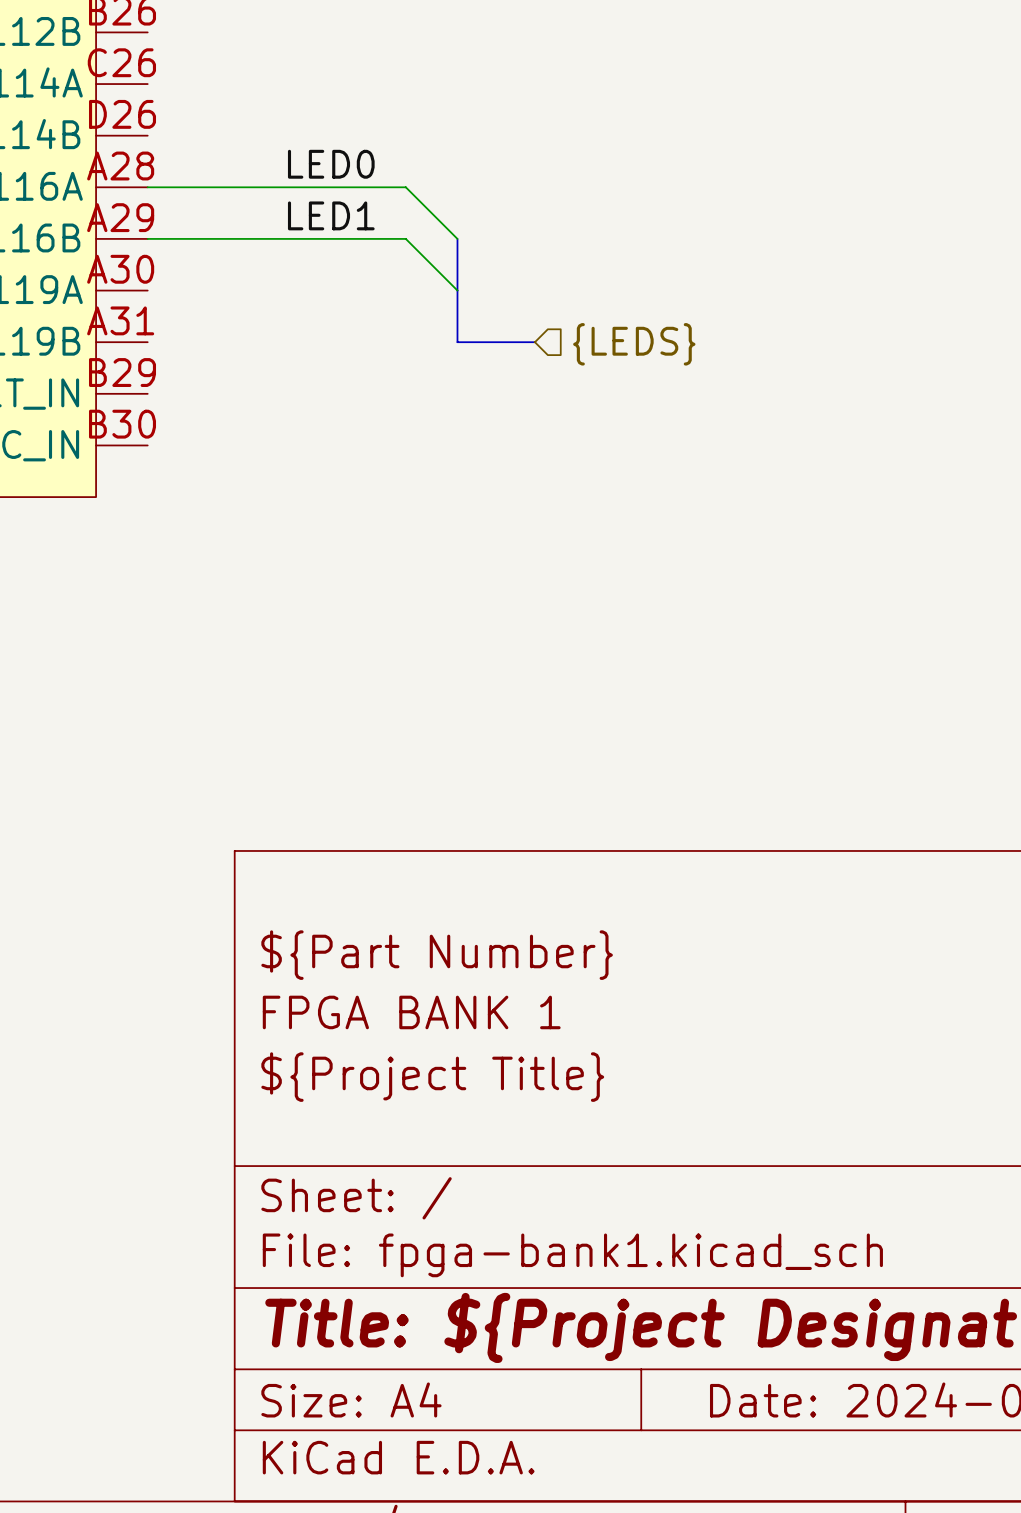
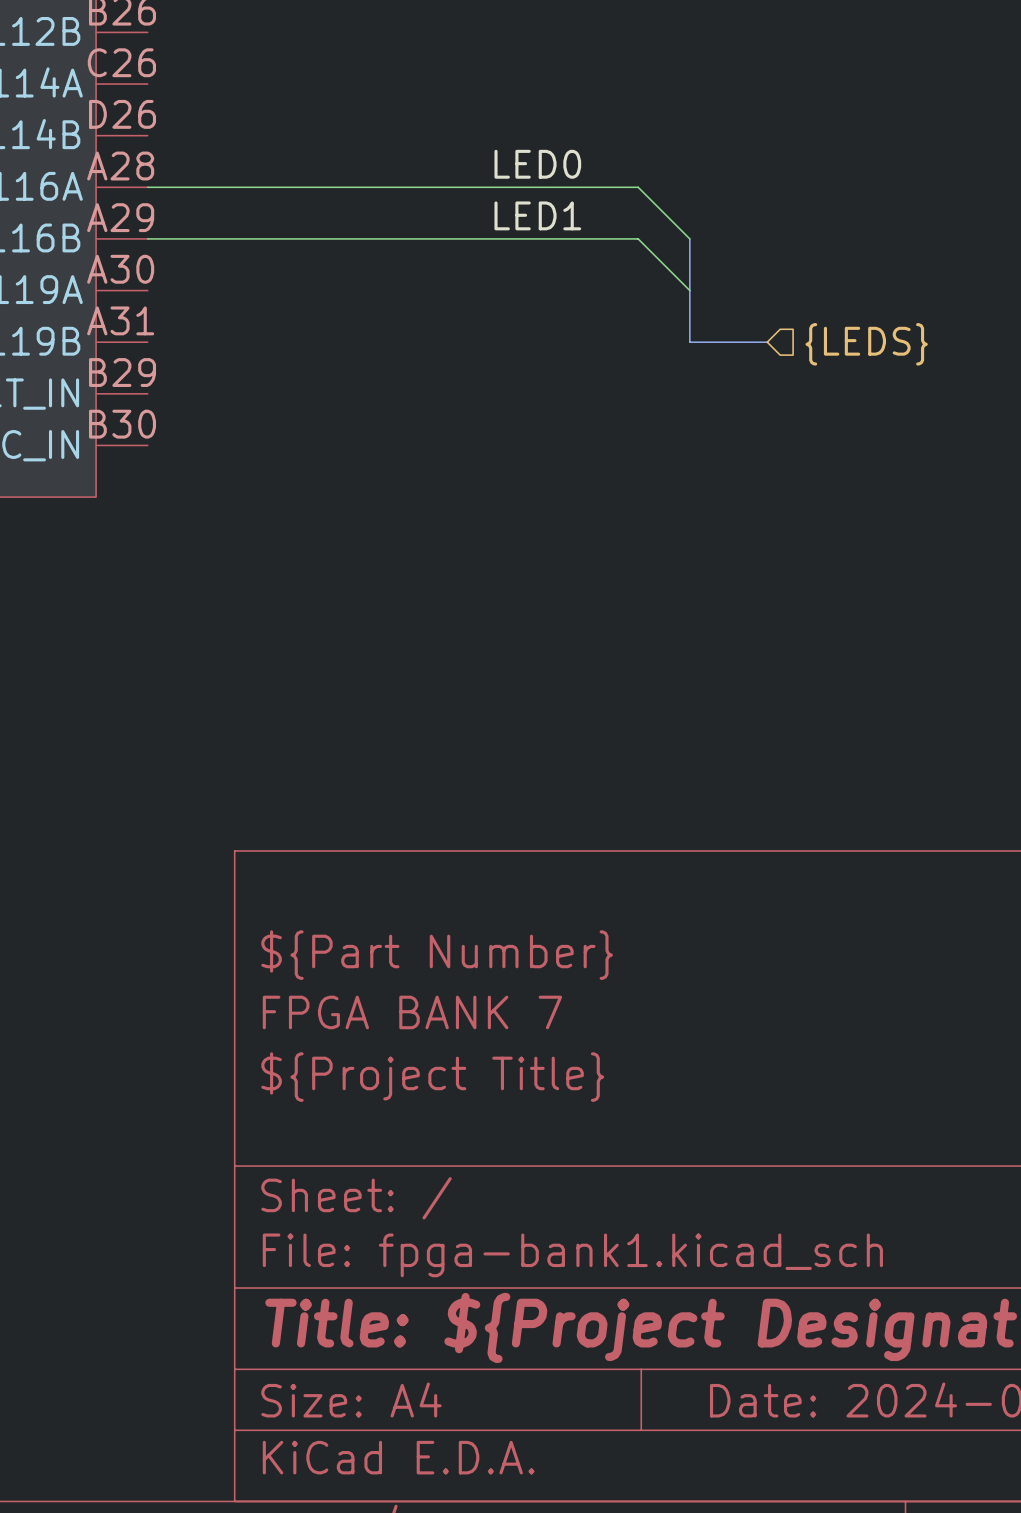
label position: LED0 (331, 164) -> LED0 (537, 164)
wire: (405, 187) (457, 238) -> (405, 187) (638, 187) (689, 238)
label position: LED1 (331, 215) -> LED1 (537, 215)
wire: (405, 238) (457, 290) -> (405, 238) (638, 238) (689, 290)
bus: (457, 238) (457, 342) (534, 342) -> (689, 238) (689, 342) (767, 342)
hierarchical label position: {LEDS} (634, 344) -> {LEDS} (866, 344)
title block: FPGA BANK 1 (411, 1012) -> FPGA BANK 7 (412, 1012)

